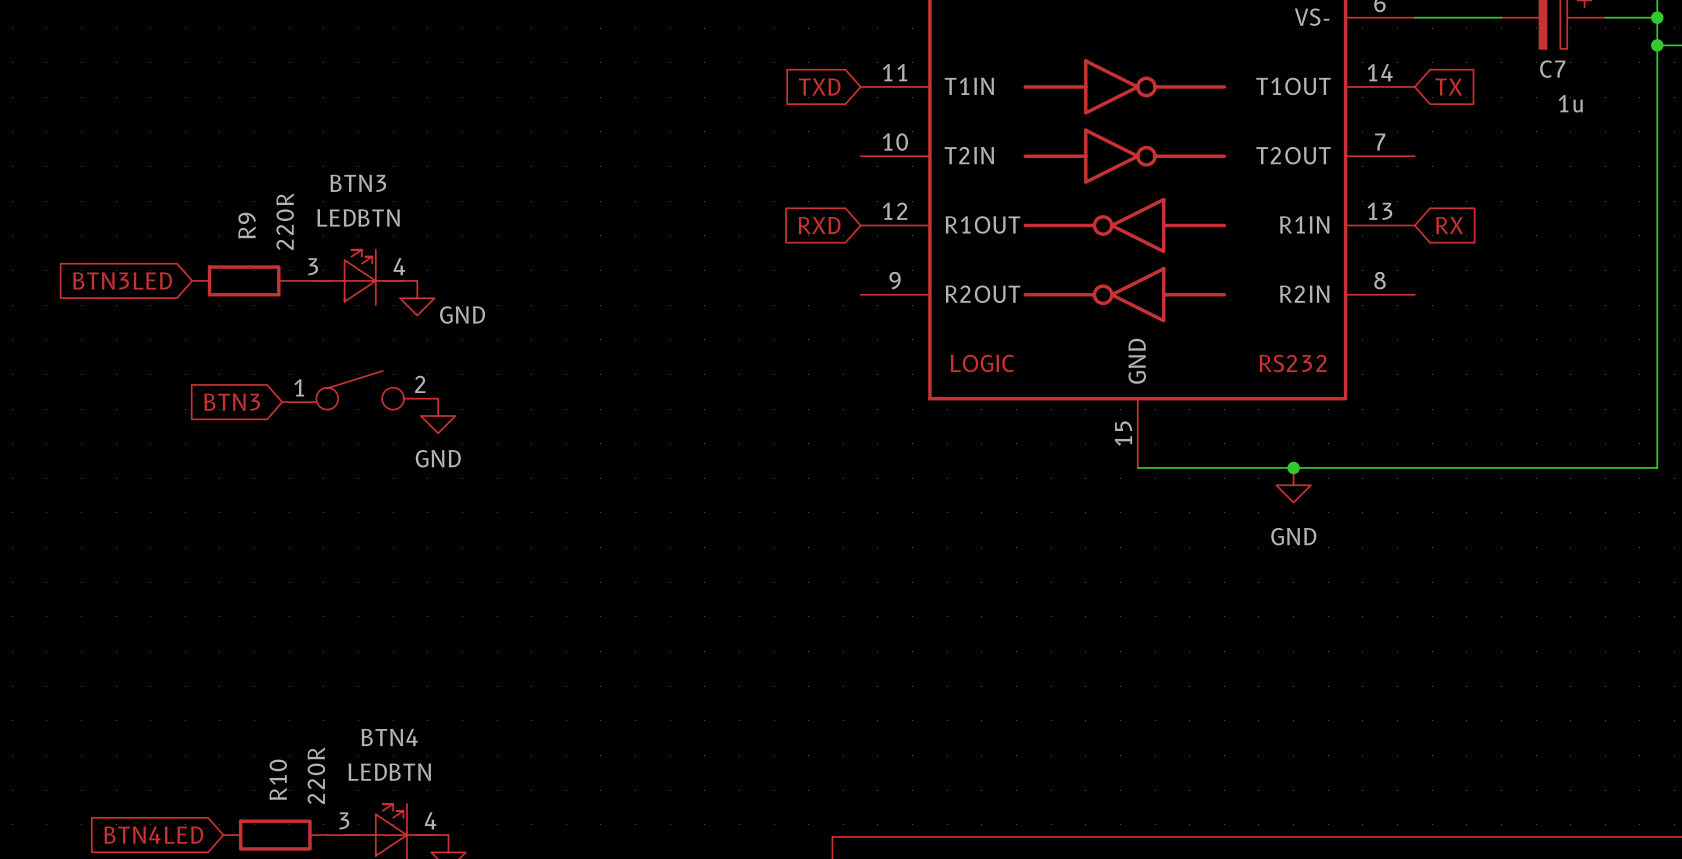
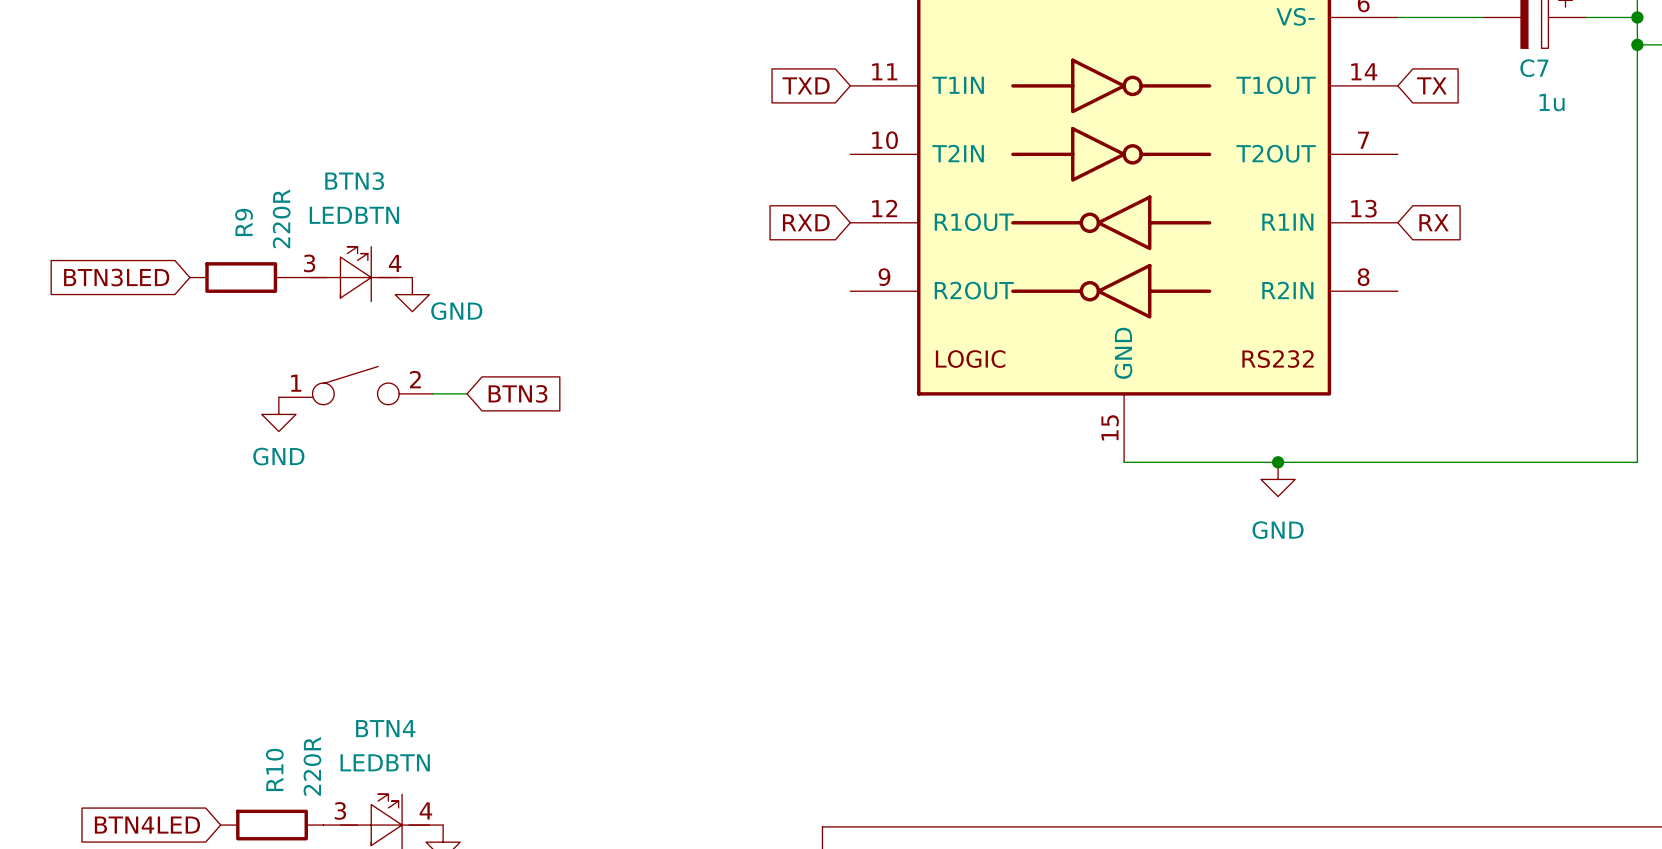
wire: none -> (432, 393) (467, 393)
global label rotation: 0° (232, 402) -> 180° (517, 393)
global label position: BTN3 (232, 402) -> BTN3 (517, 393)
power symbol position: GND (438, 415) -> GND (278, 414)

